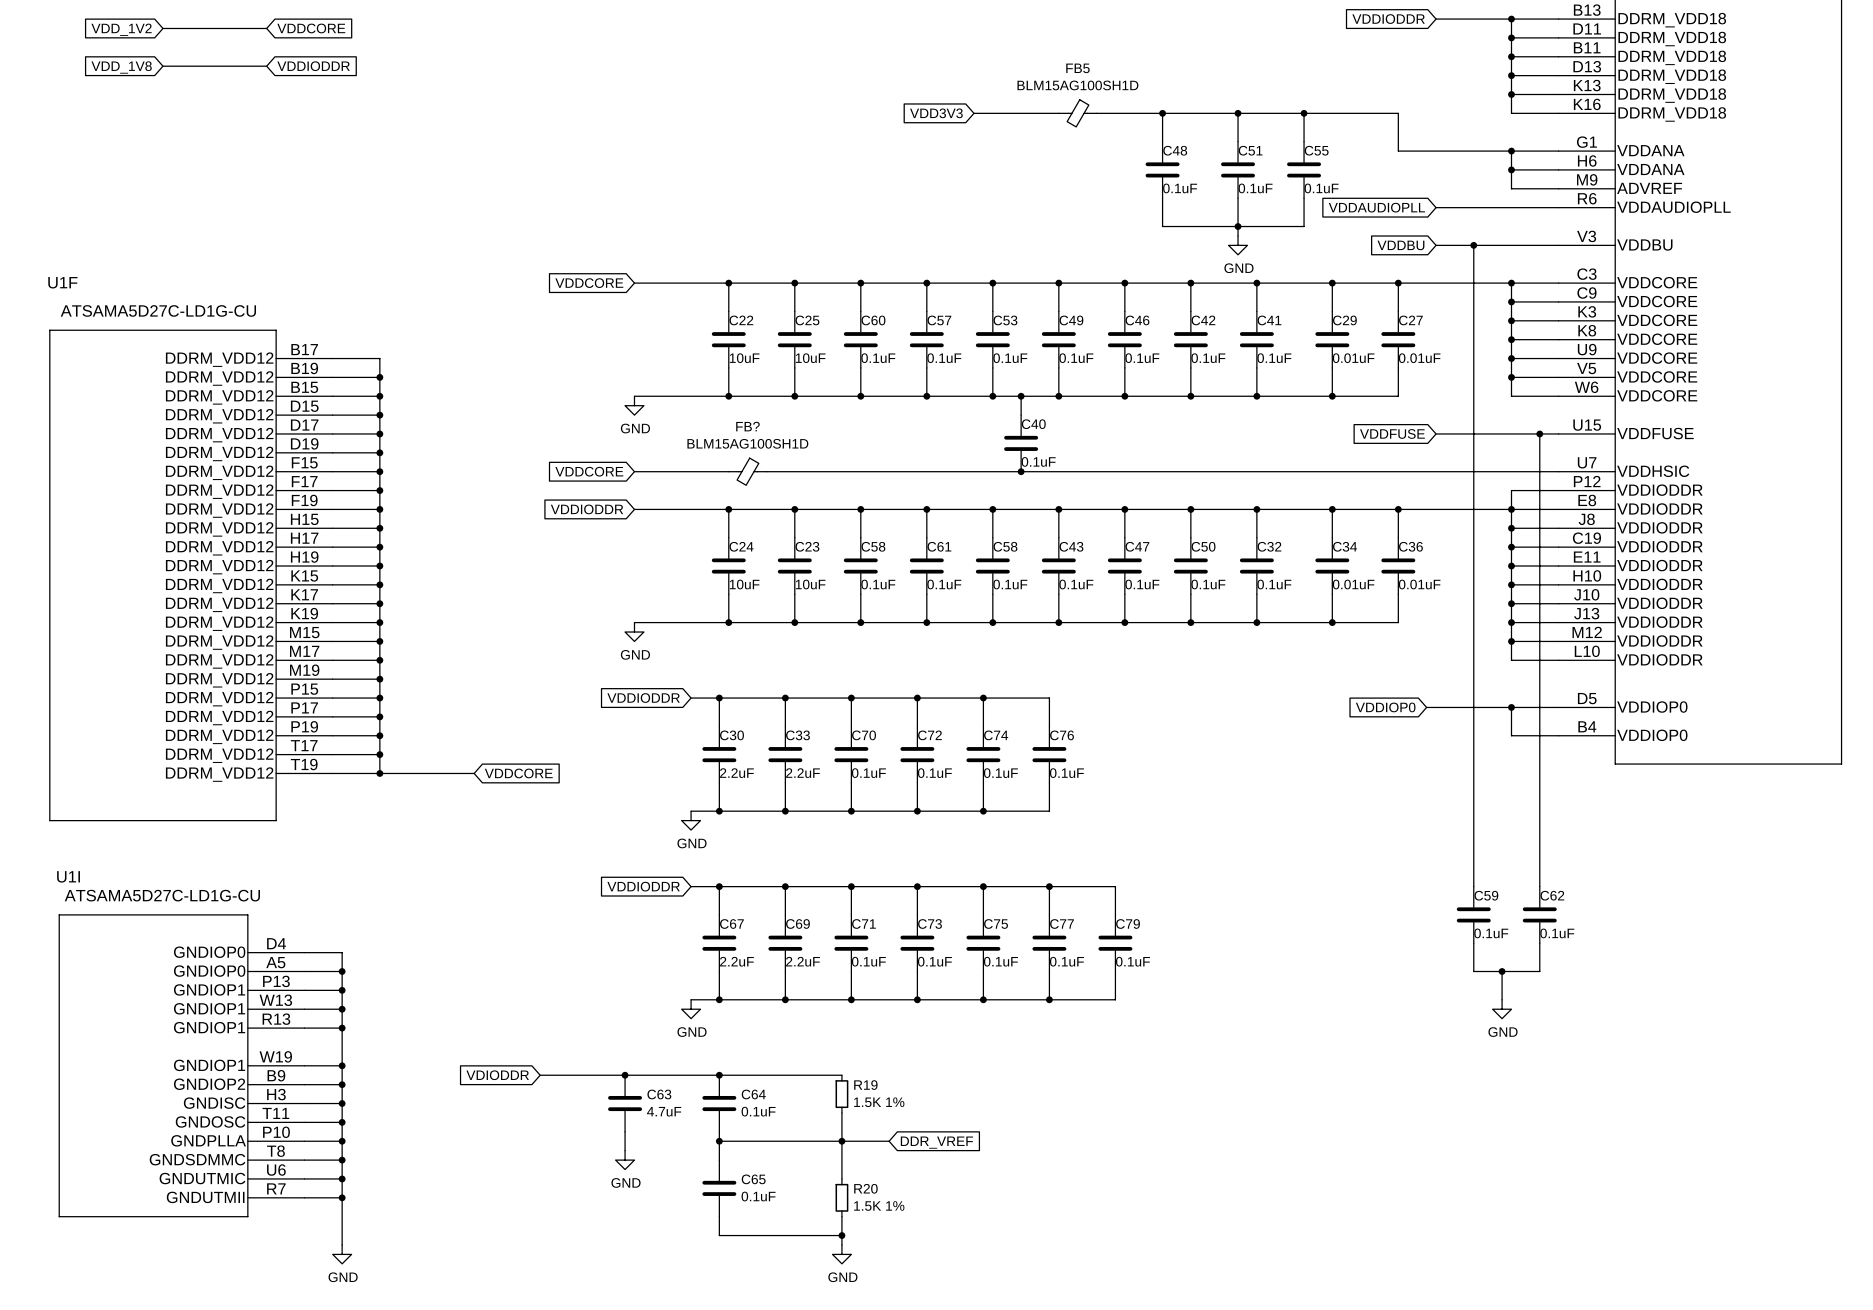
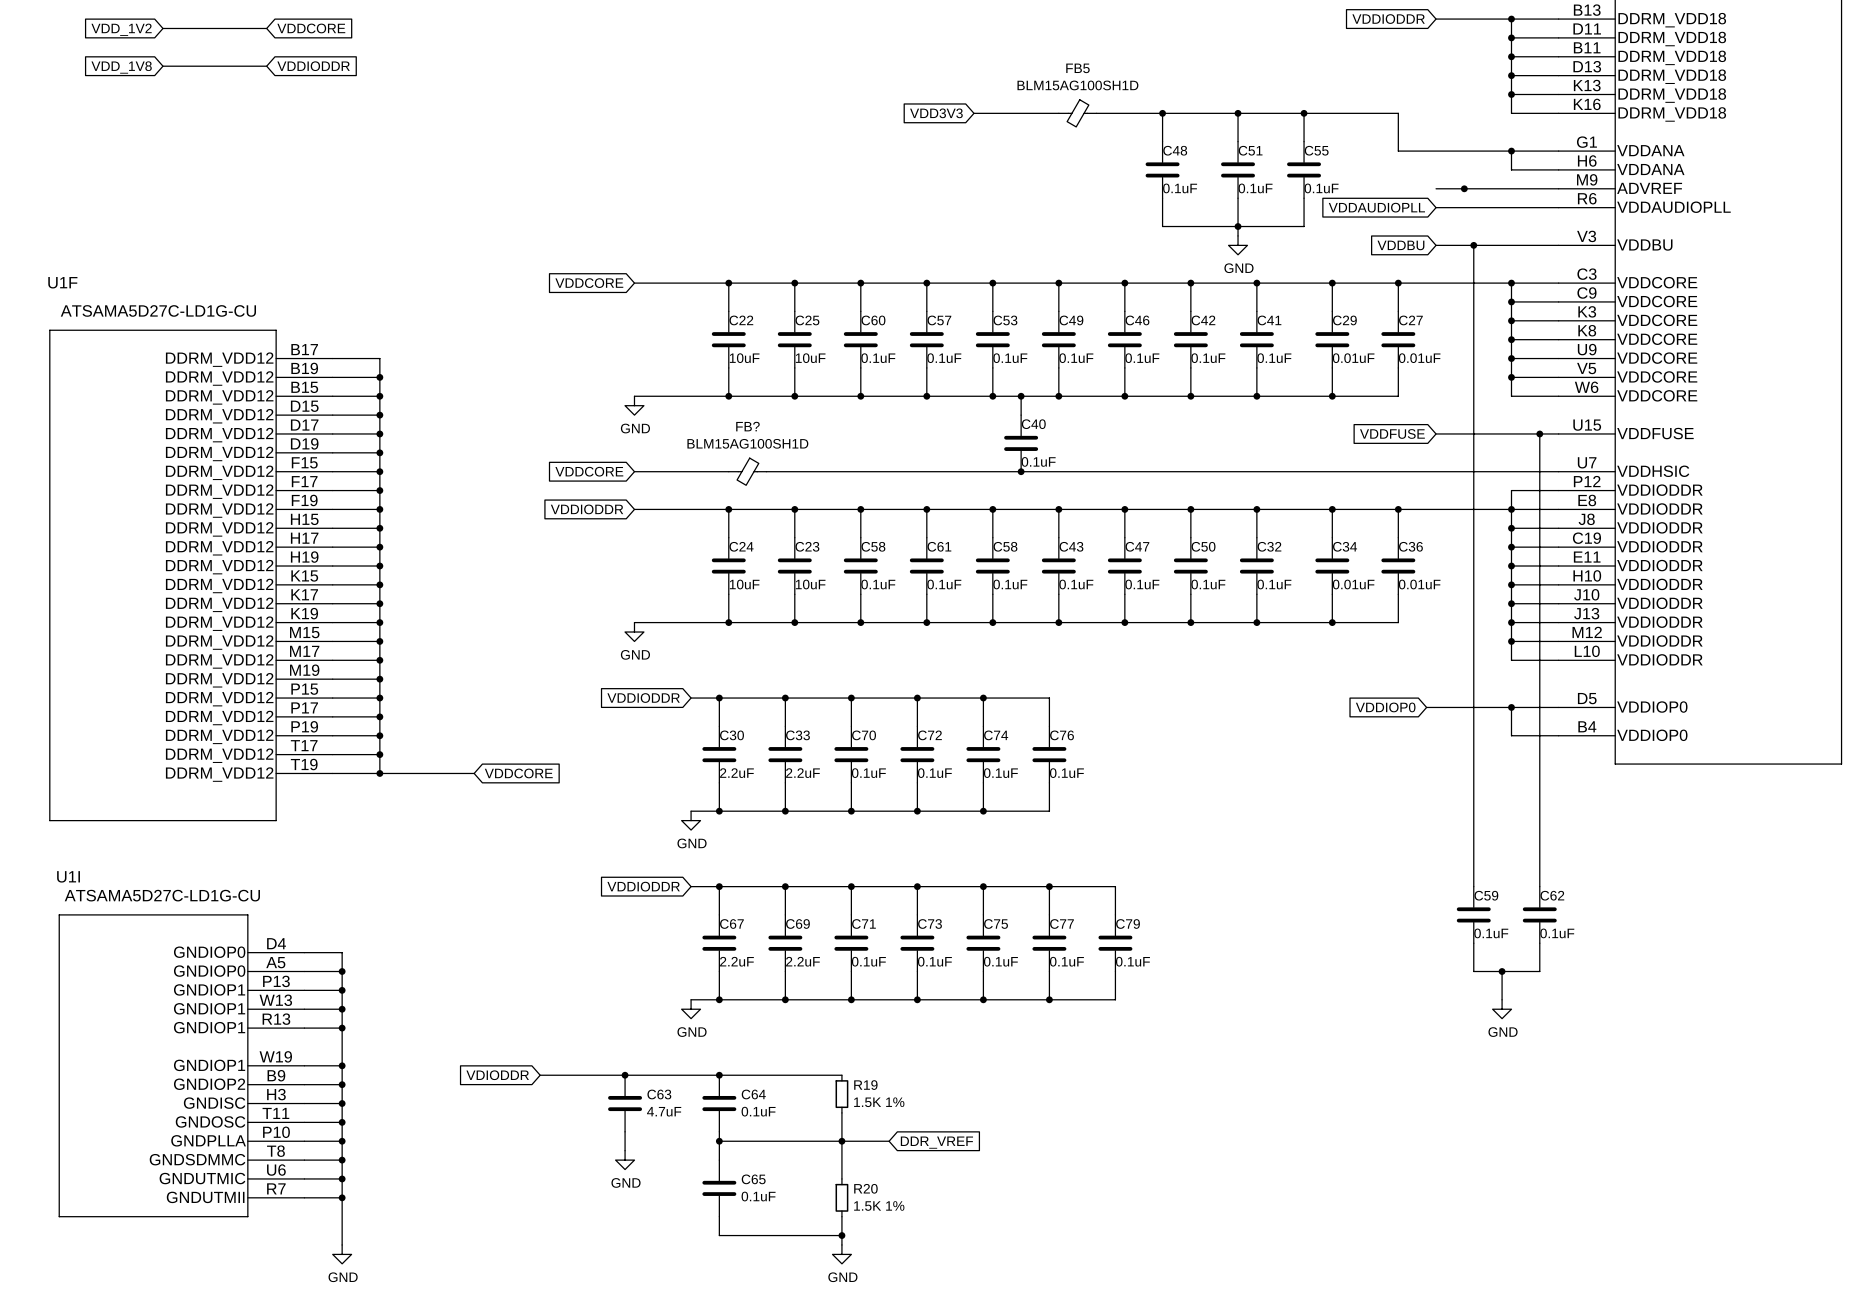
wire: (1511, 169) (1511, 188) -> (1436, 188) (1511, 188)
junction: (1511, 169) -> none
junction: none -> (1464, 188)

